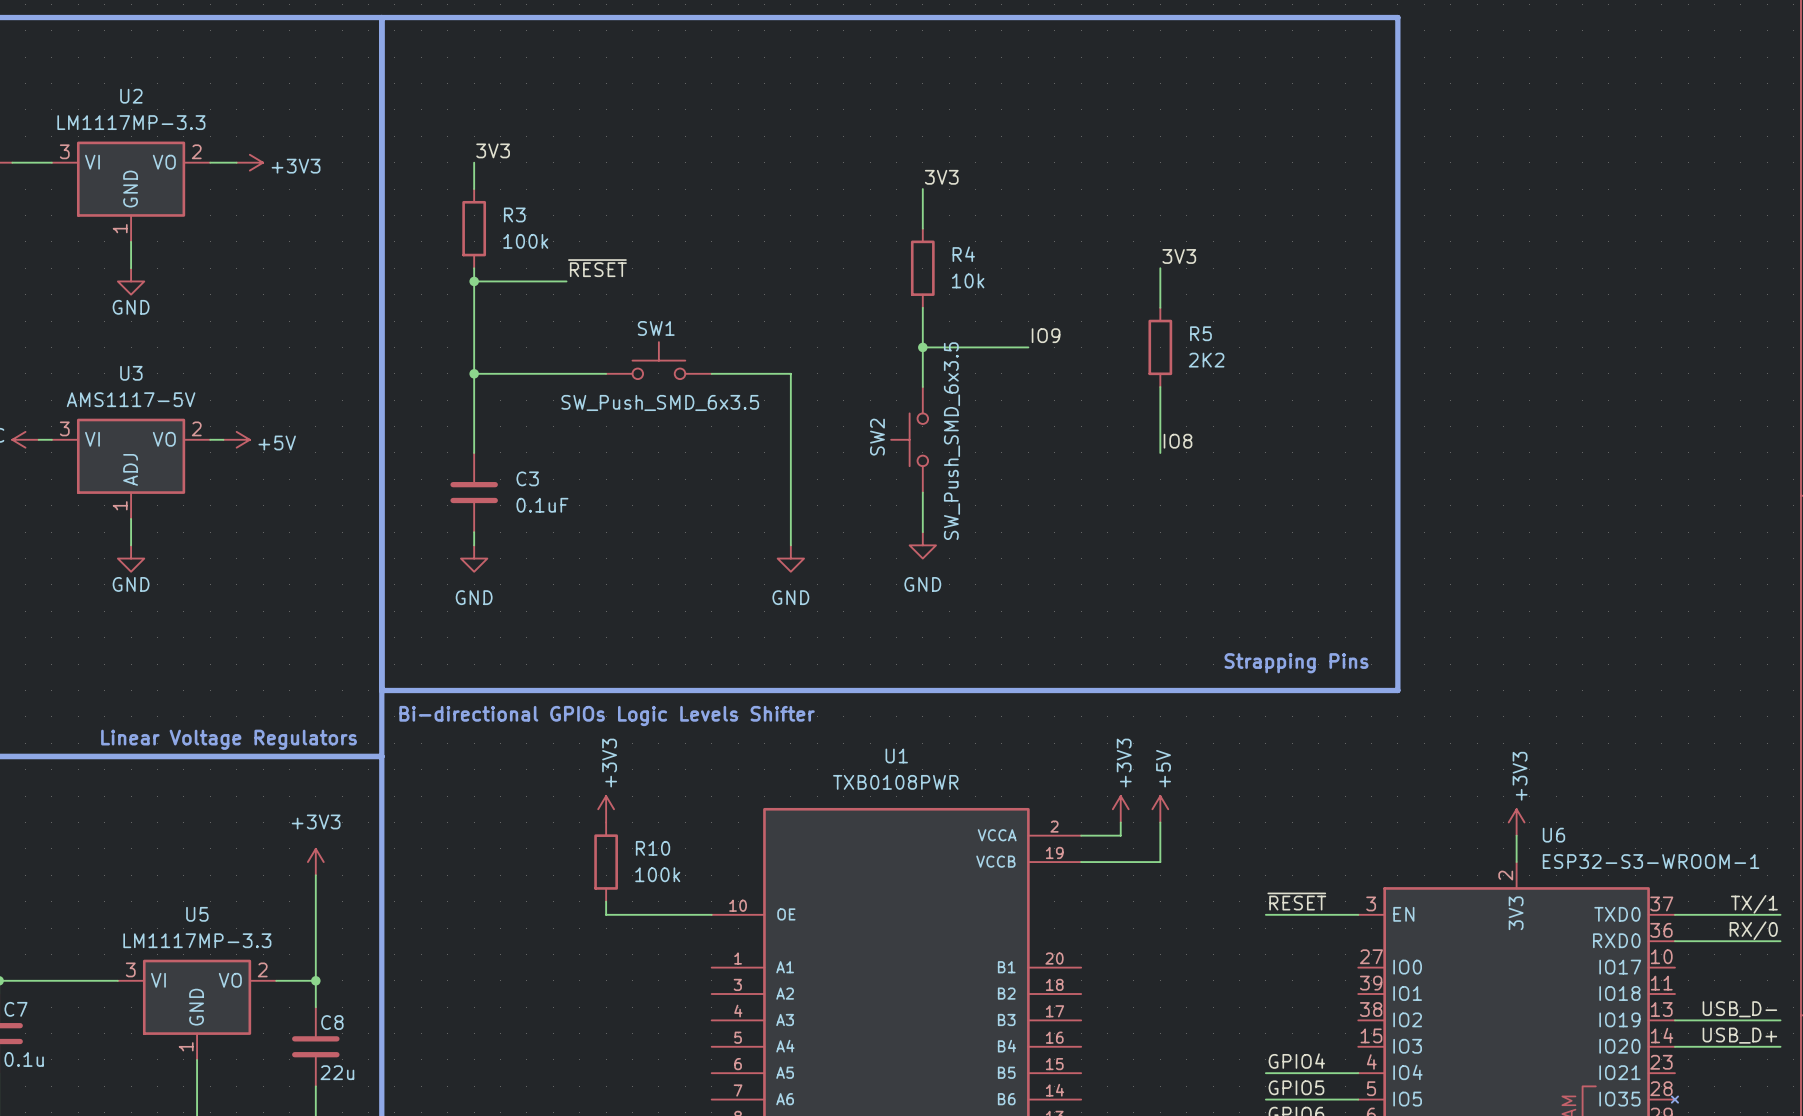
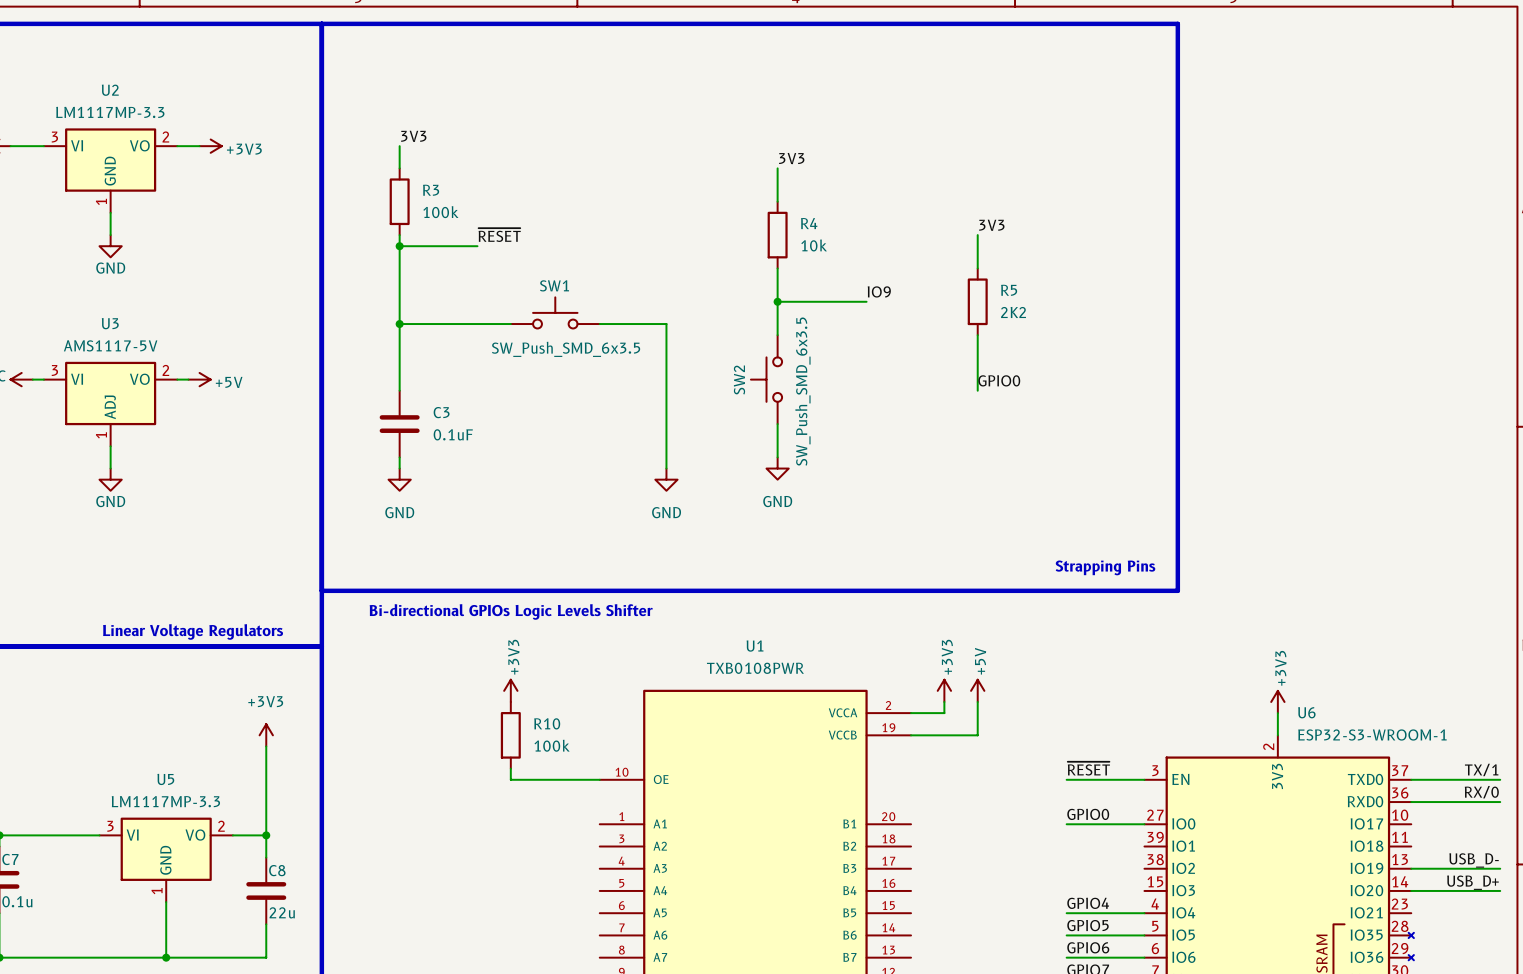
label: IO8 (1178, 441) -> GPIO0 (999, 380)
label: none -> GPIO0 (1088, 814)
wire: none -> (1066, 824) (1144, 824)

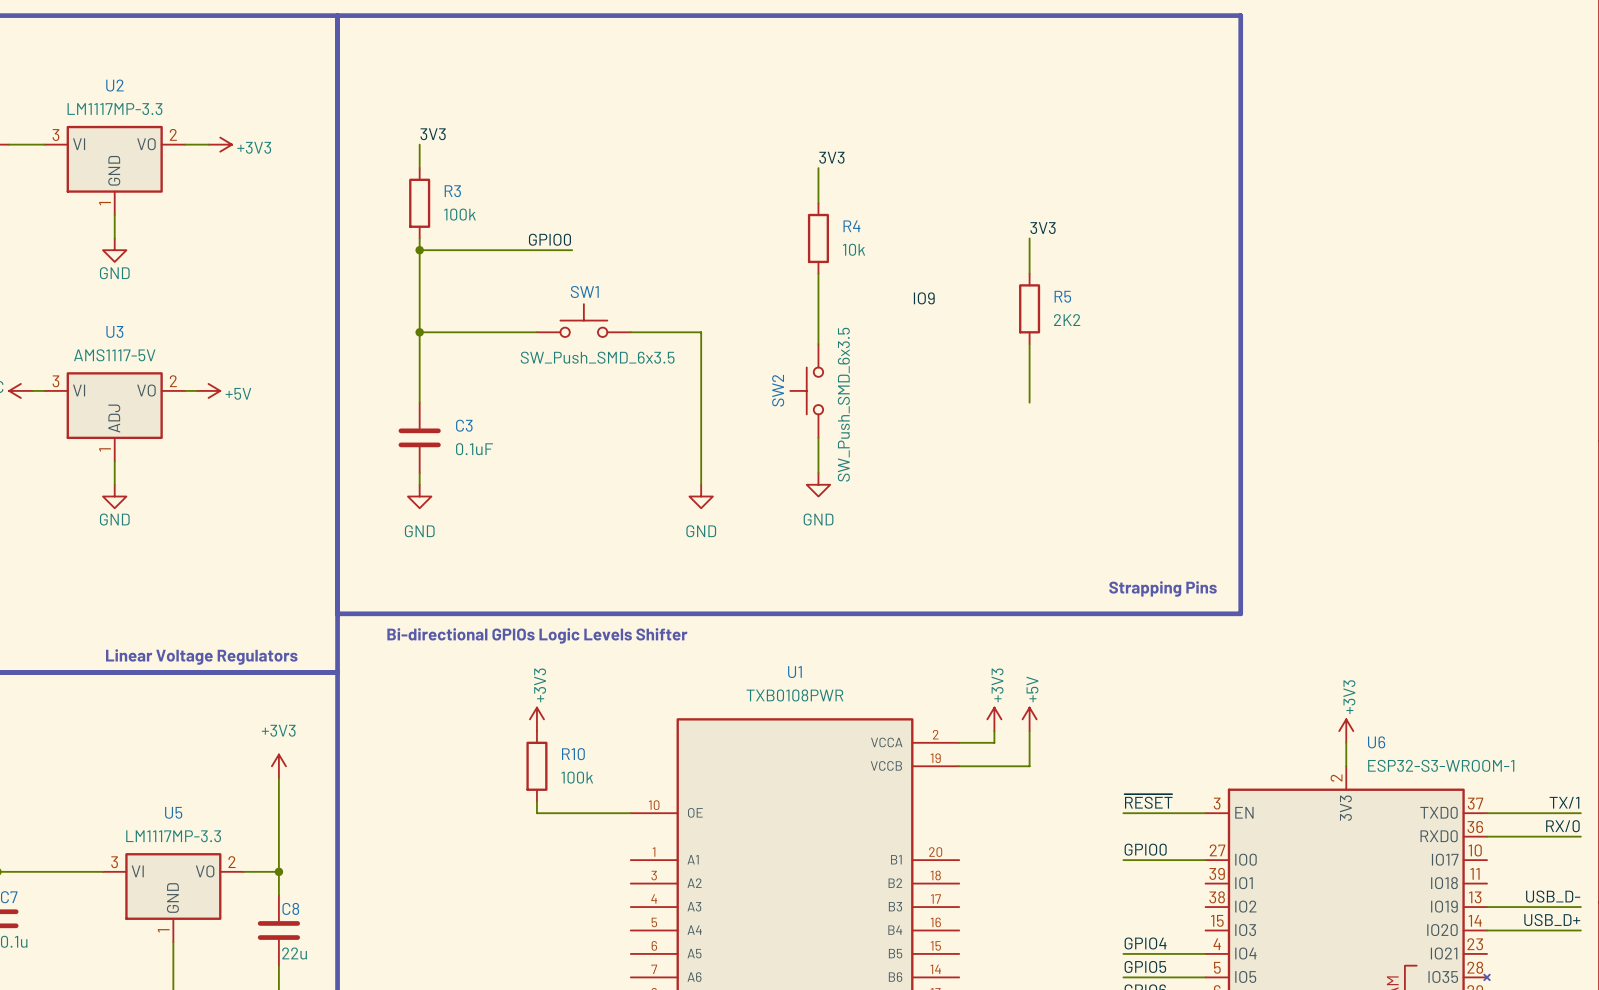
label: ~{RESET} (499, 235) -> none
label: none -> GPIO0 (549, 239)
wire: none -> (501, 250) (572, 250)
wire: (777, 301) (866, 301) -> none
junction: (777, 301) -> none
label: GPIO0 (999, 380) -> none

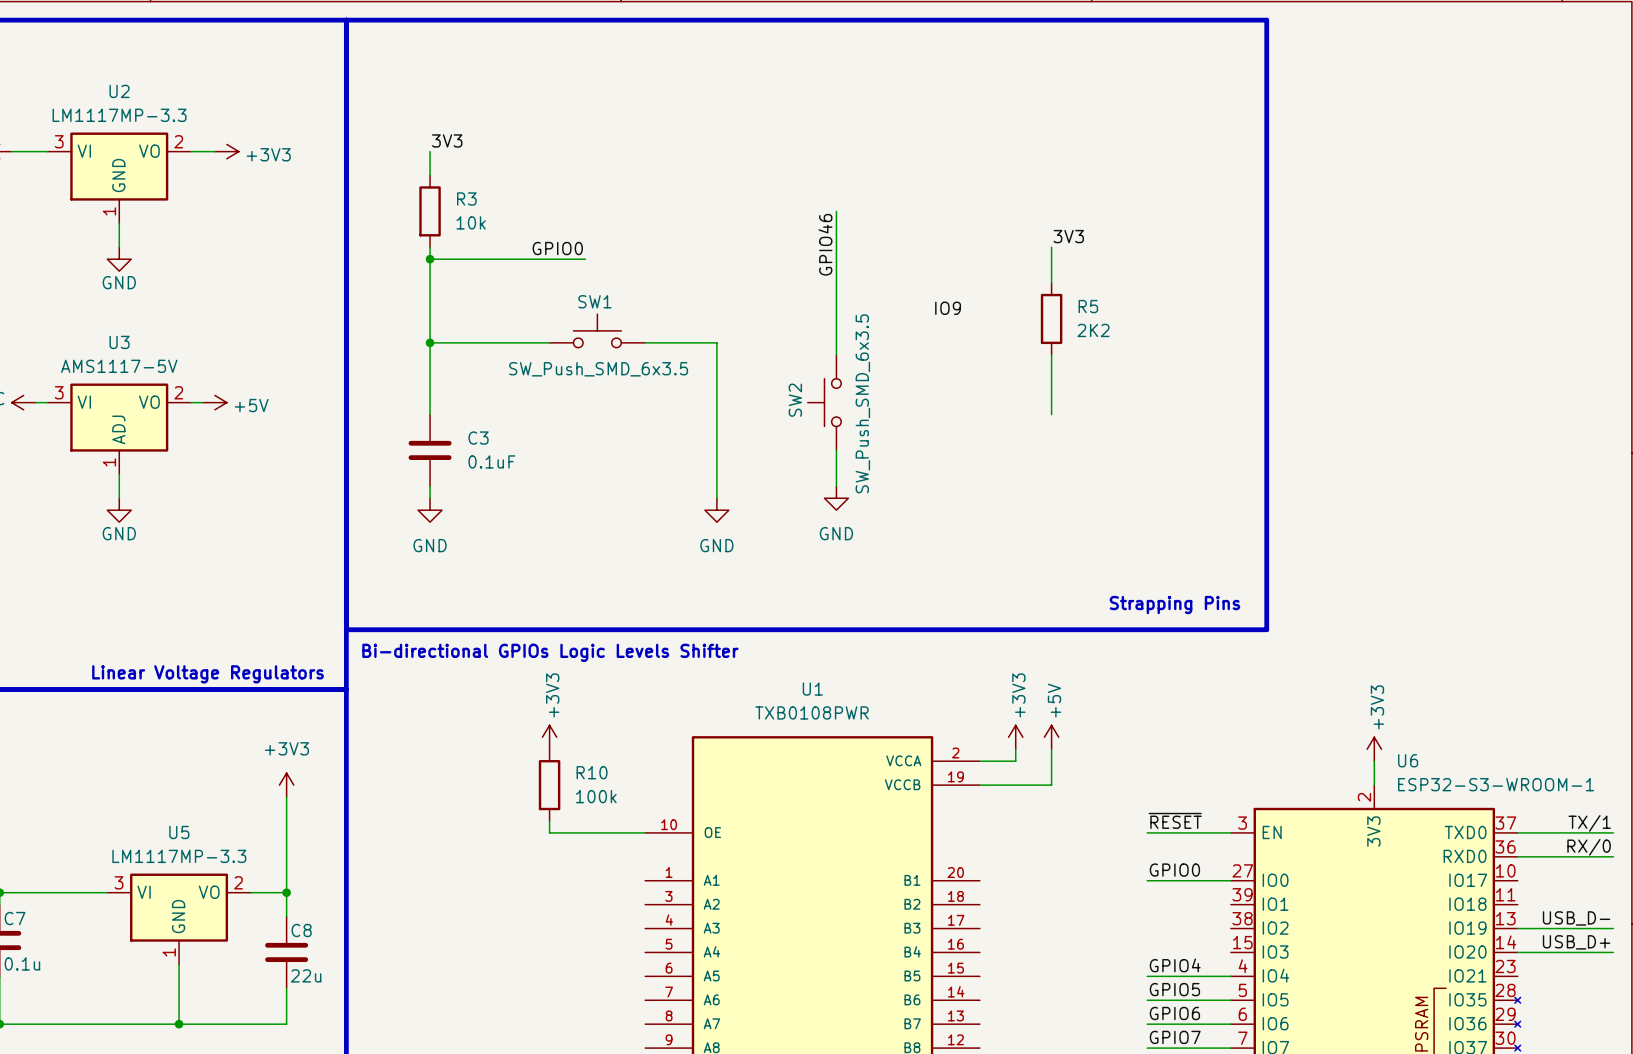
label: 3V3 (831, 157) -> none
wire: (818, 168) (818, 203) -> (836, 283) (836, 211)
R3 value: 100k (459, 214) -> 10k (471, 222)
label: none -> GPIO46 (825, 244)
R4: 10k (818, 238) -> none

